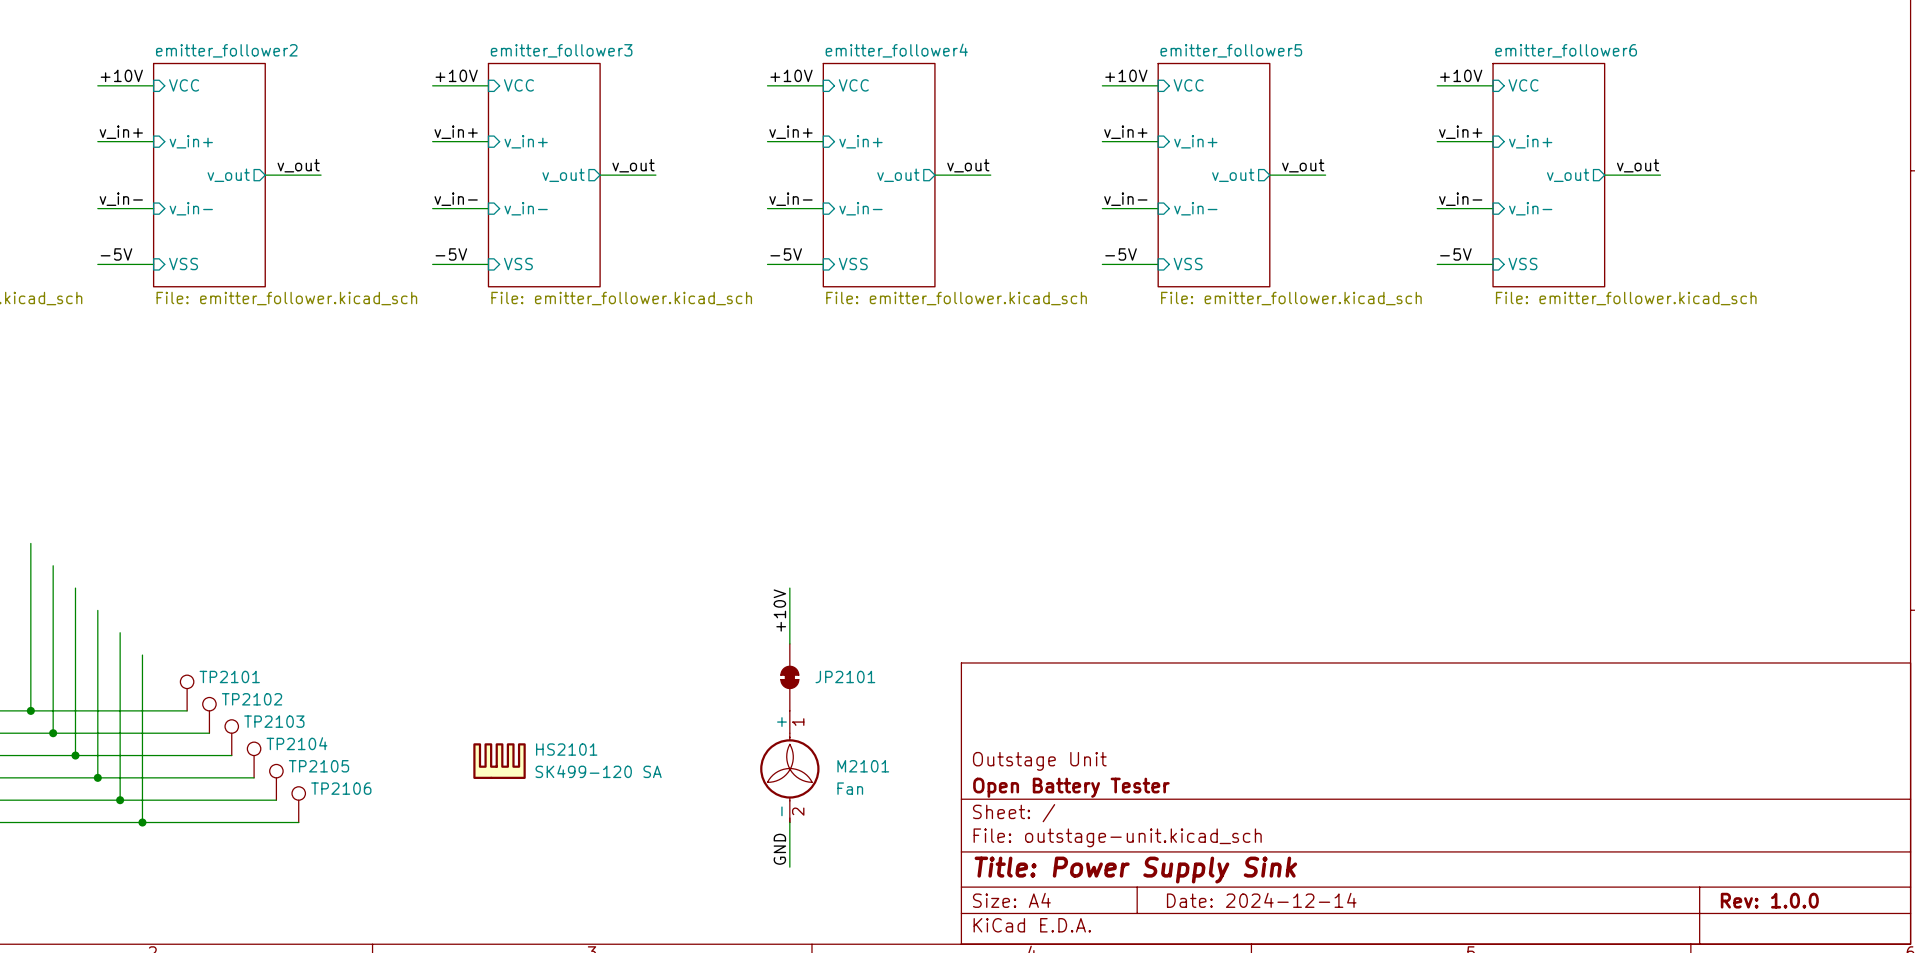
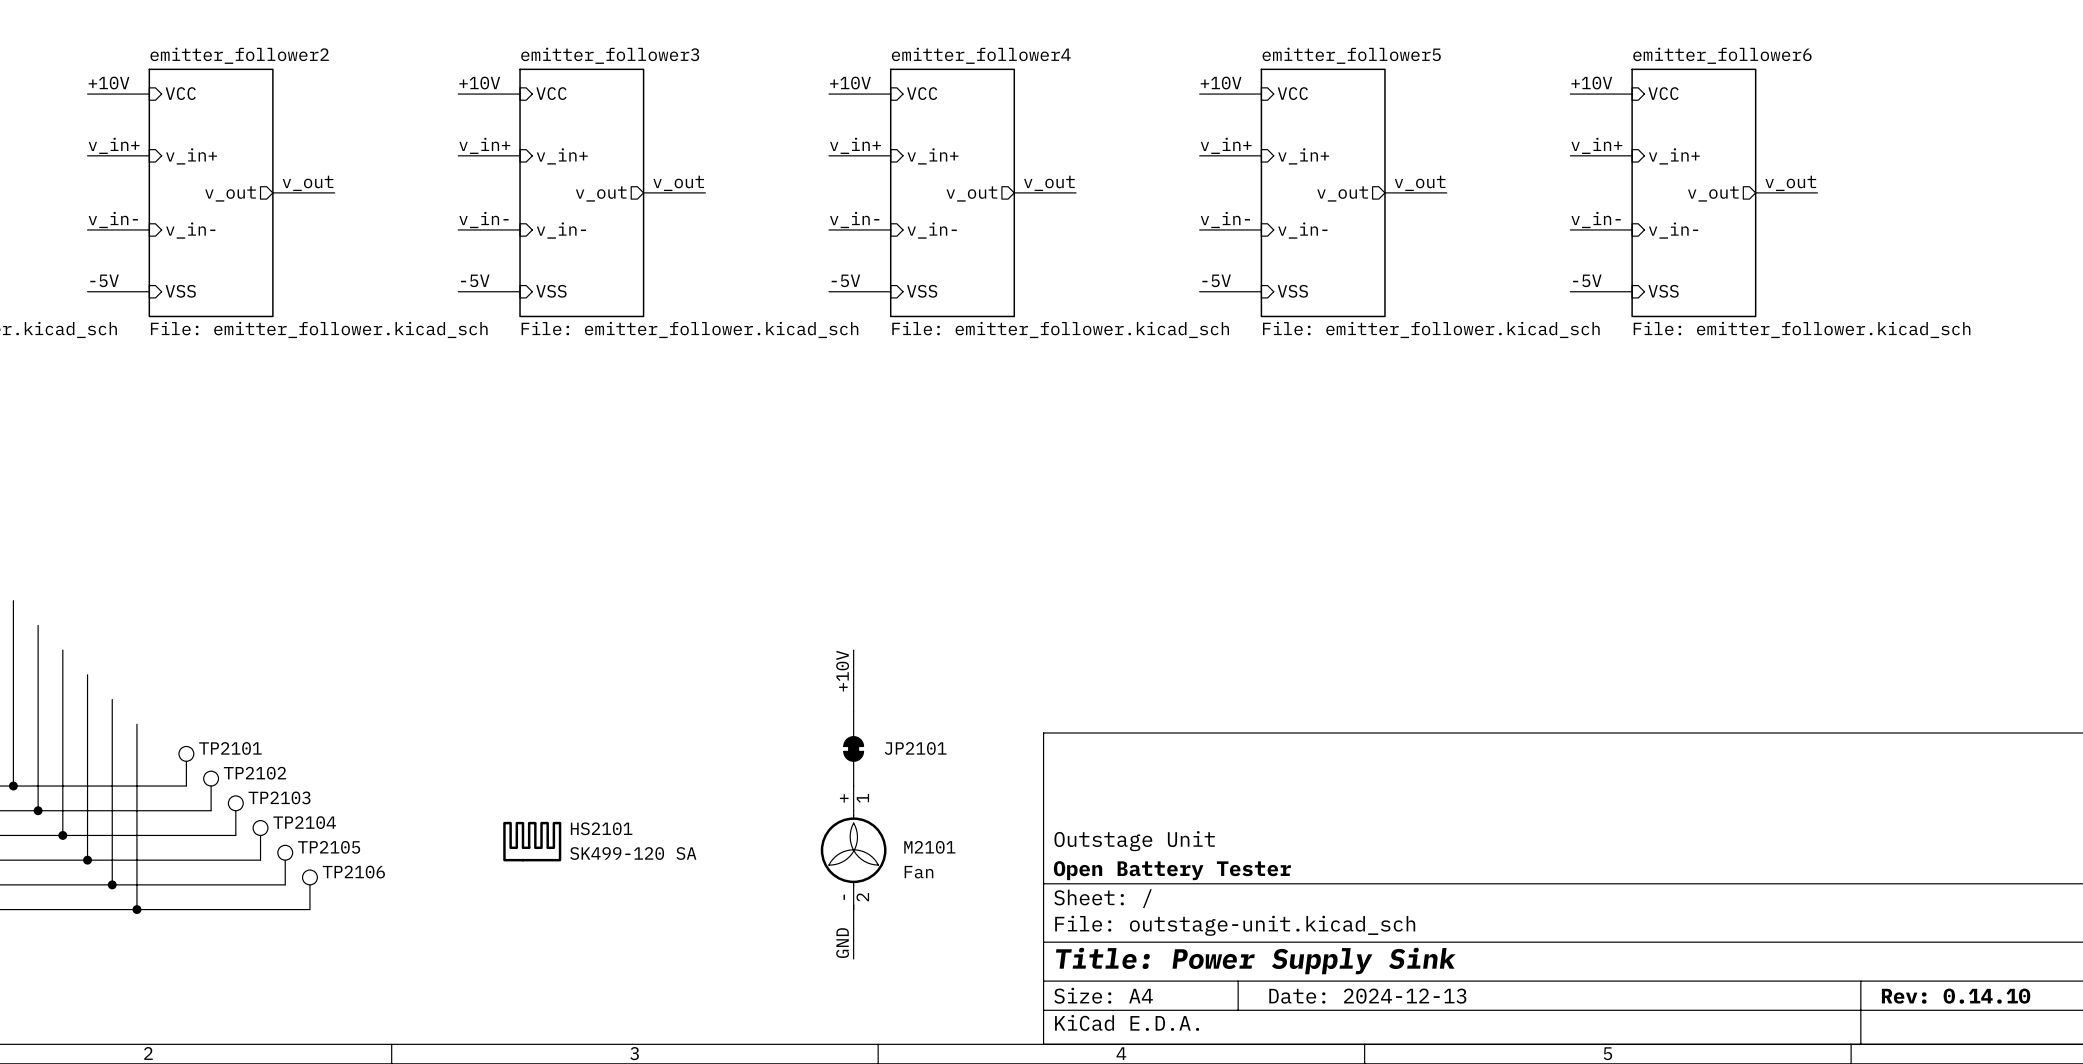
title block: Date: 2024-12-14 (1261, 900) -> Date: 2024-12-13 (1367, 996)
title block: Rev: 1.0.0 (1769, 900) -> Rev: 0.14.10 (1956, 996)

